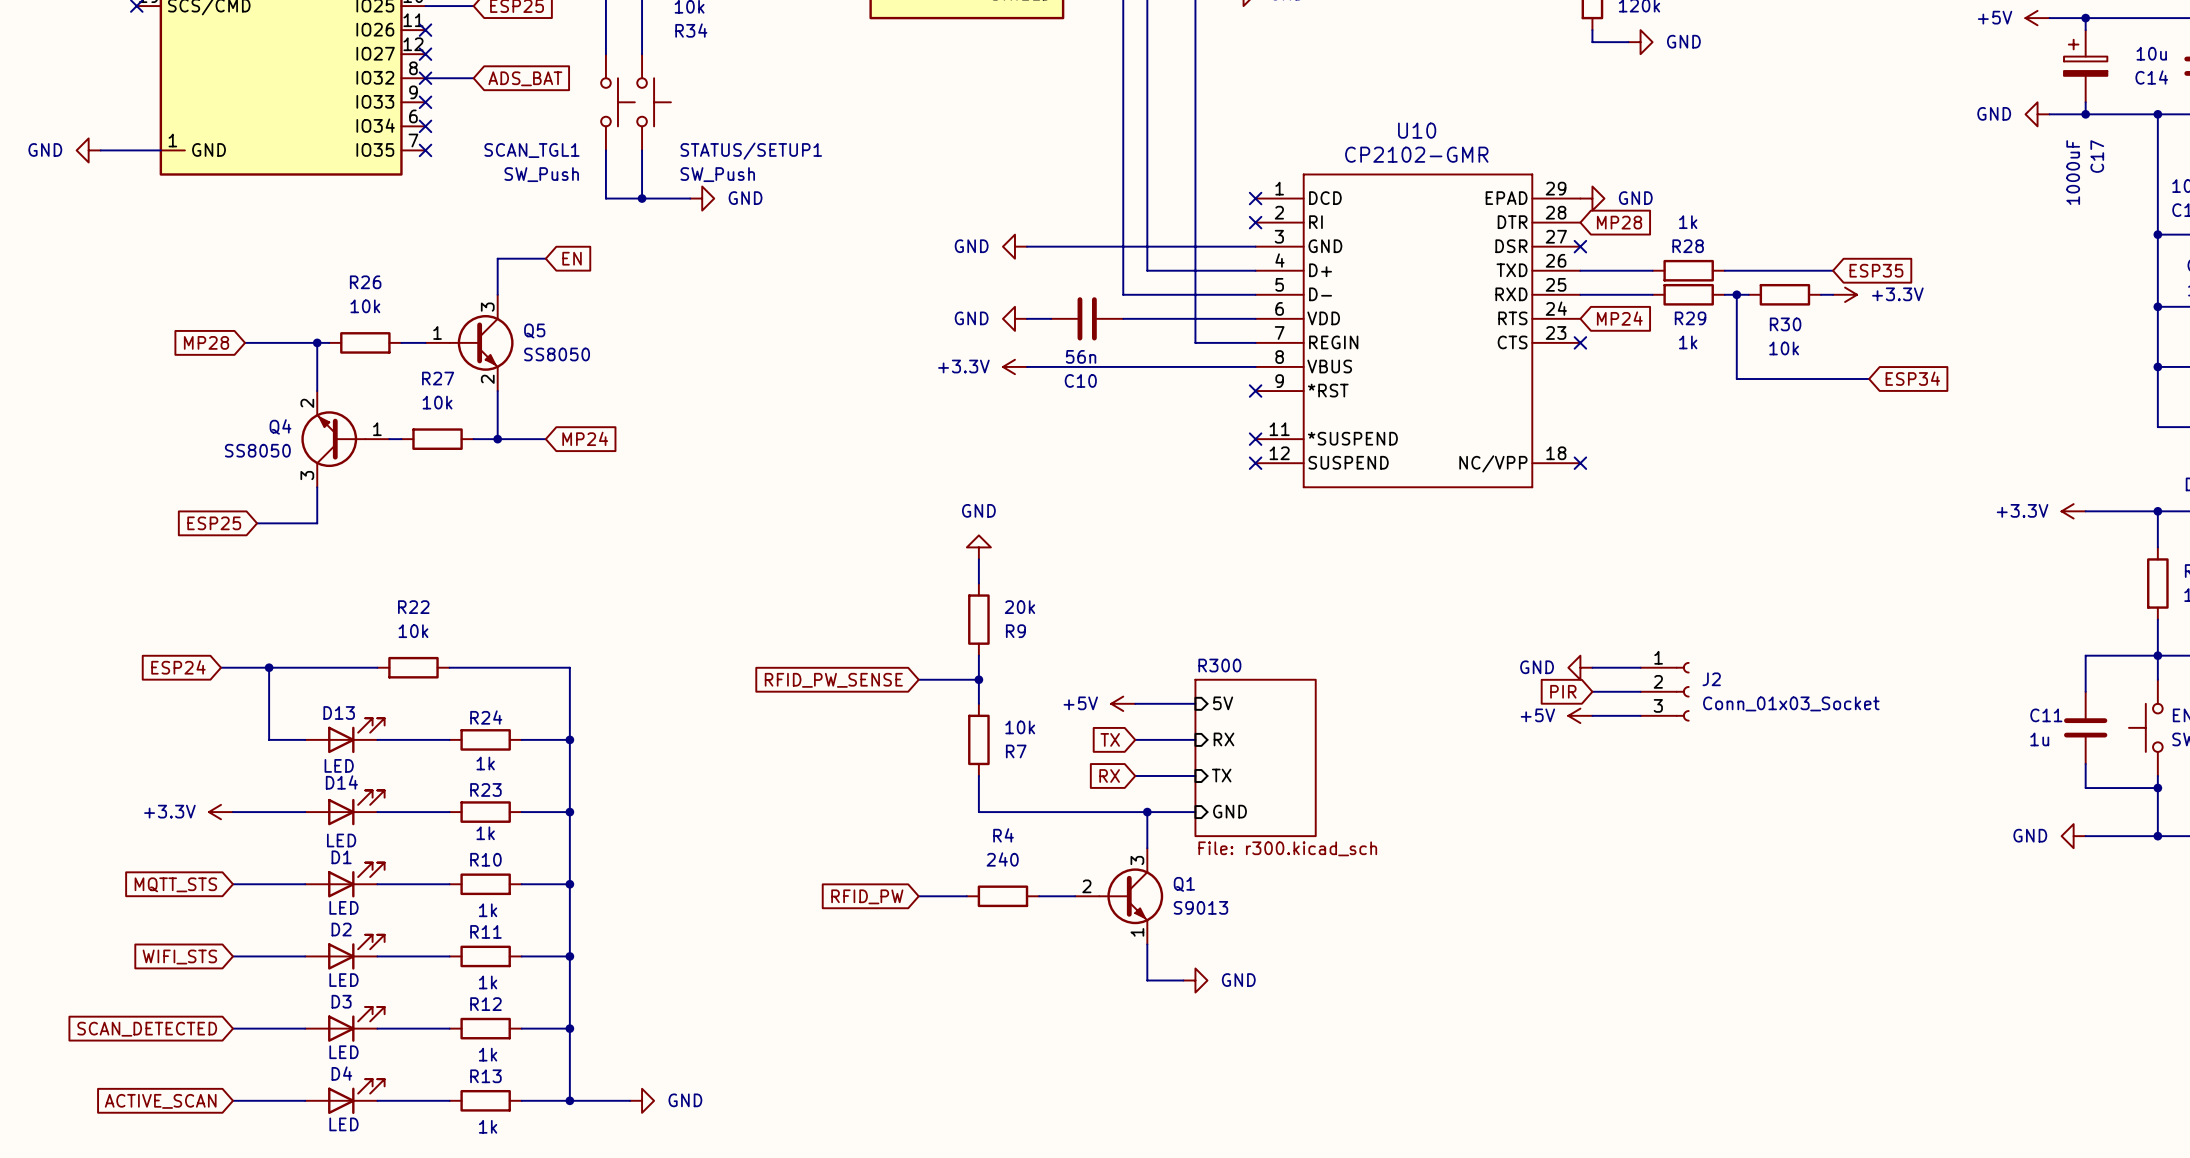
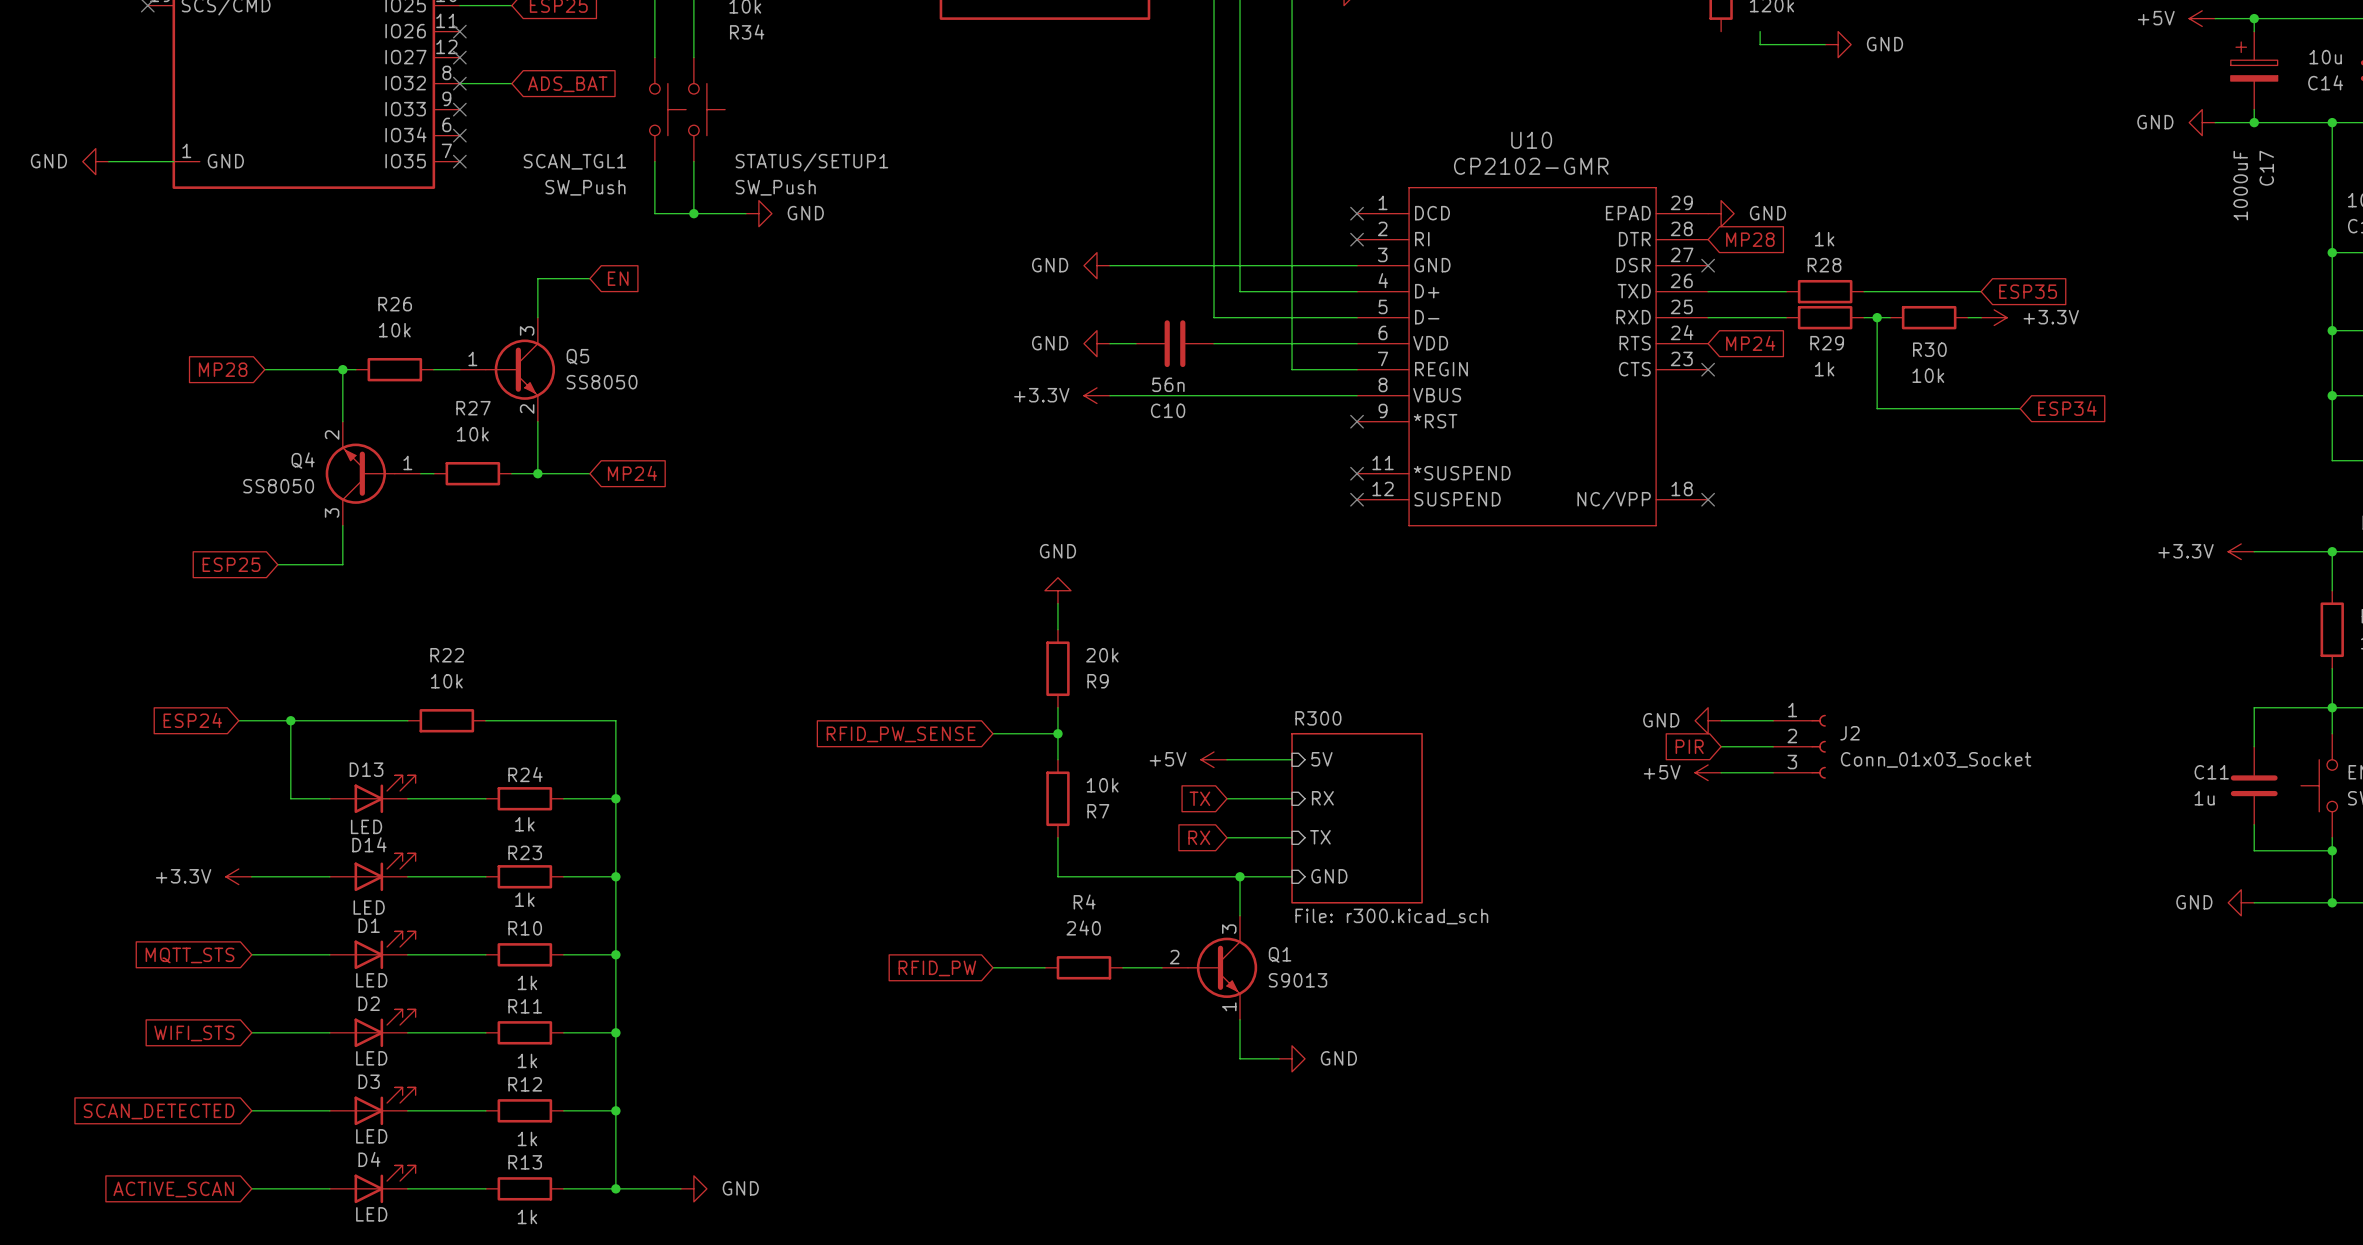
wire: (1592, 30) (1592, 42) (1628, 42) -> none
wire: none -> (1760, 31) (1760, 44) (1825, 44)
power symbol position: GND (1640, 42) -> GND (1838, 44)

